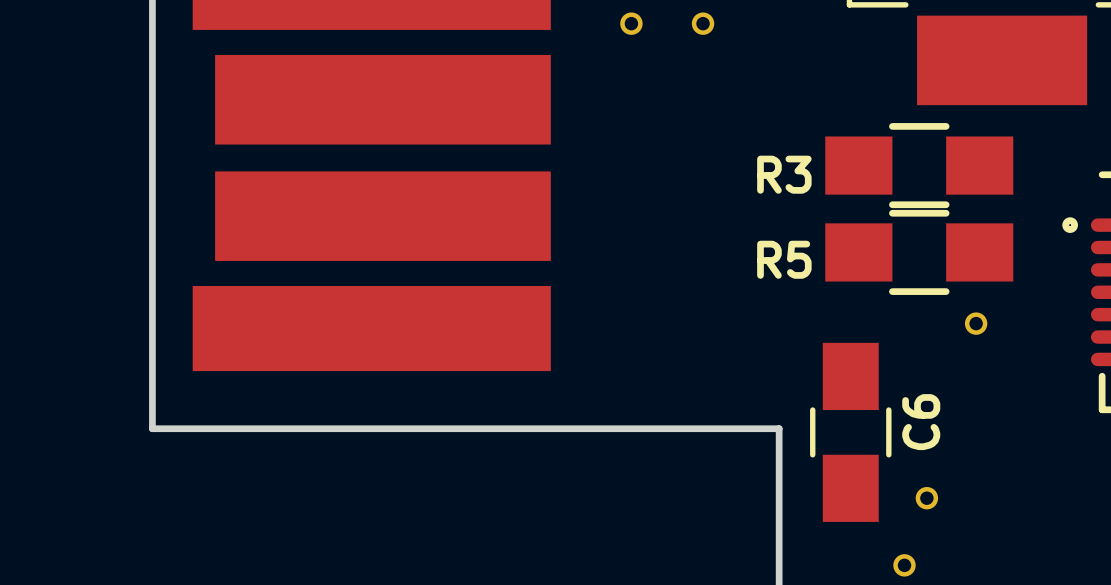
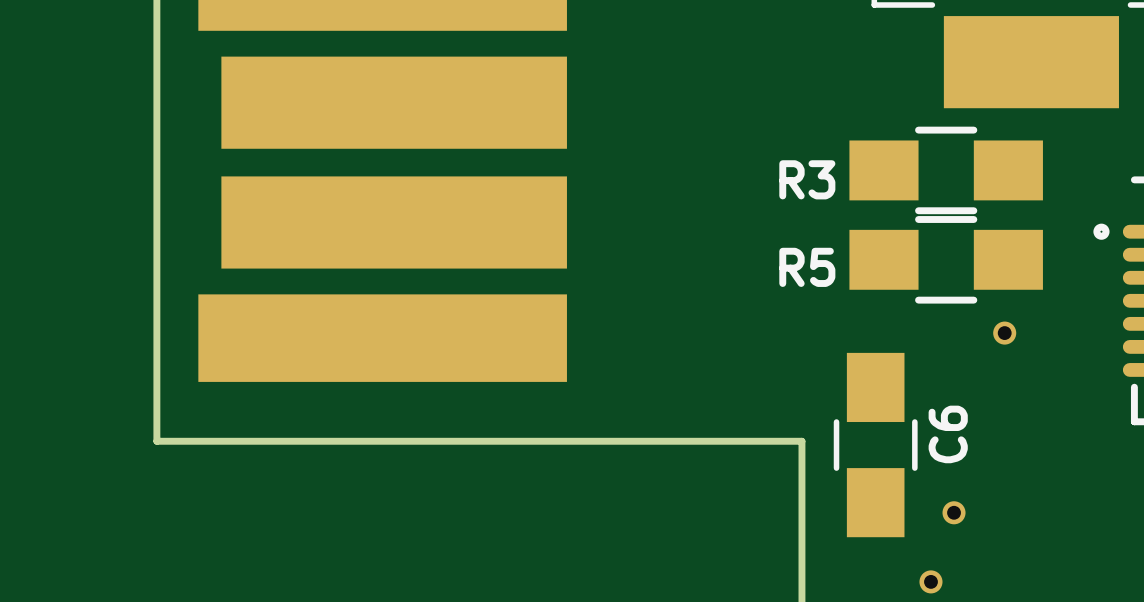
part: (631, 23) -> none
part: (703, 23) -> none

